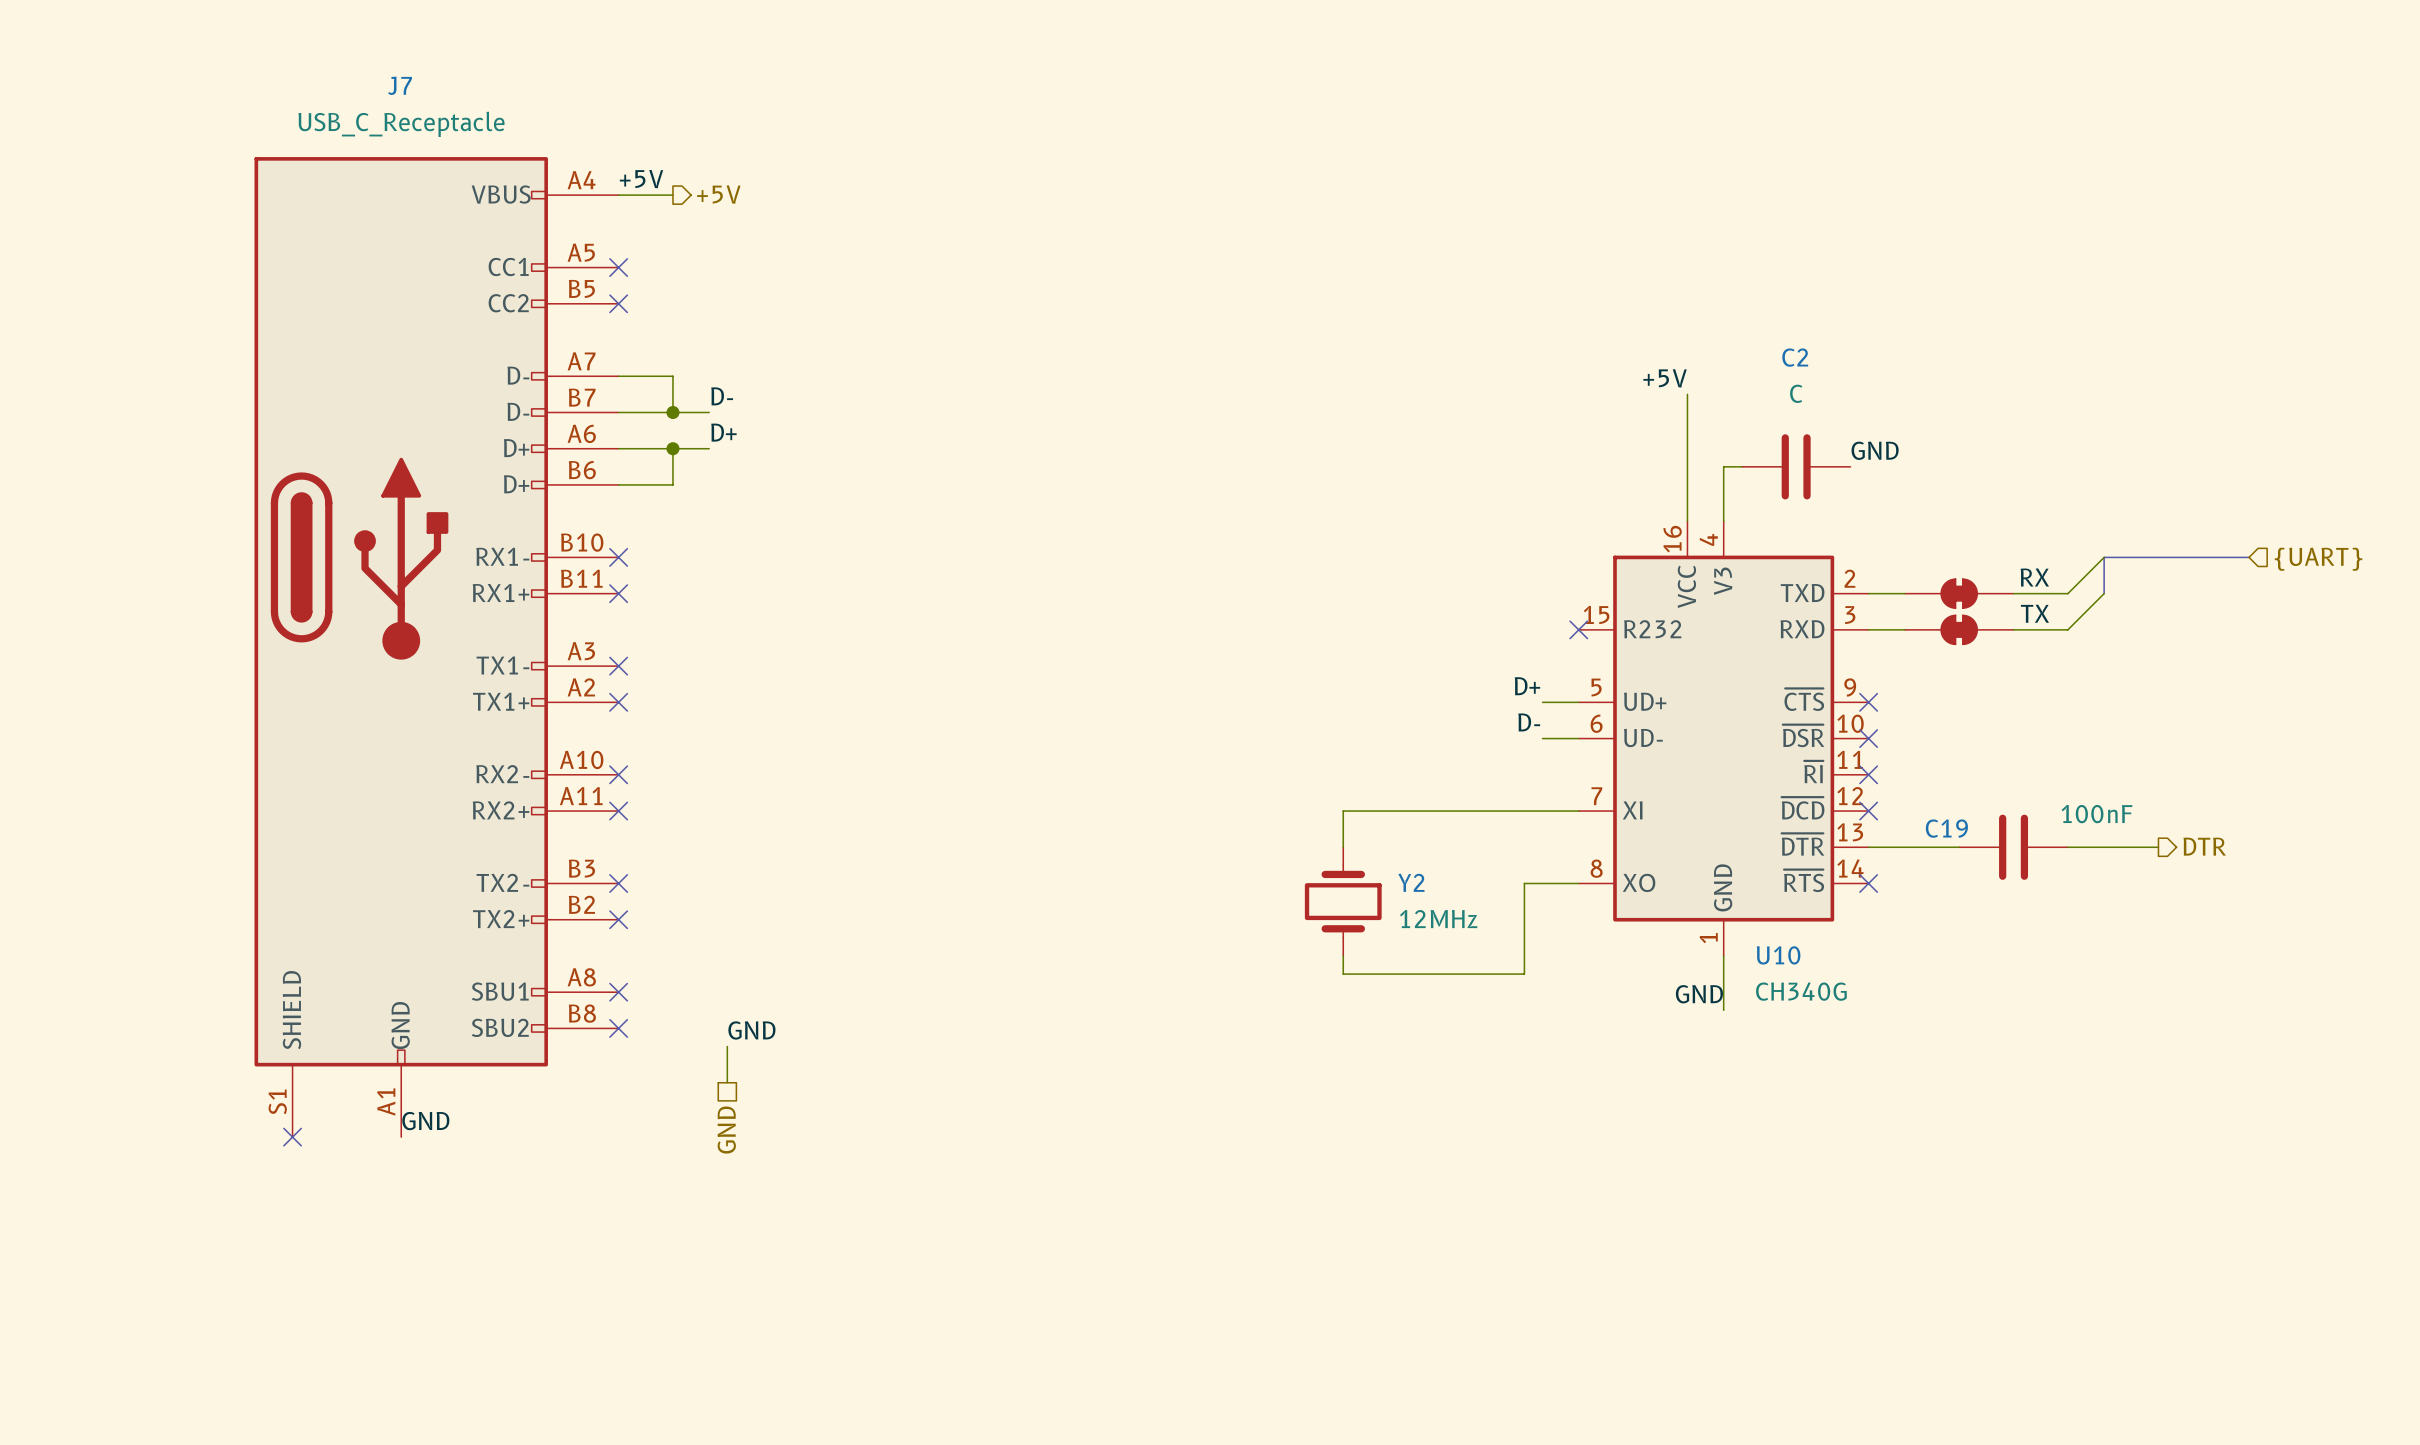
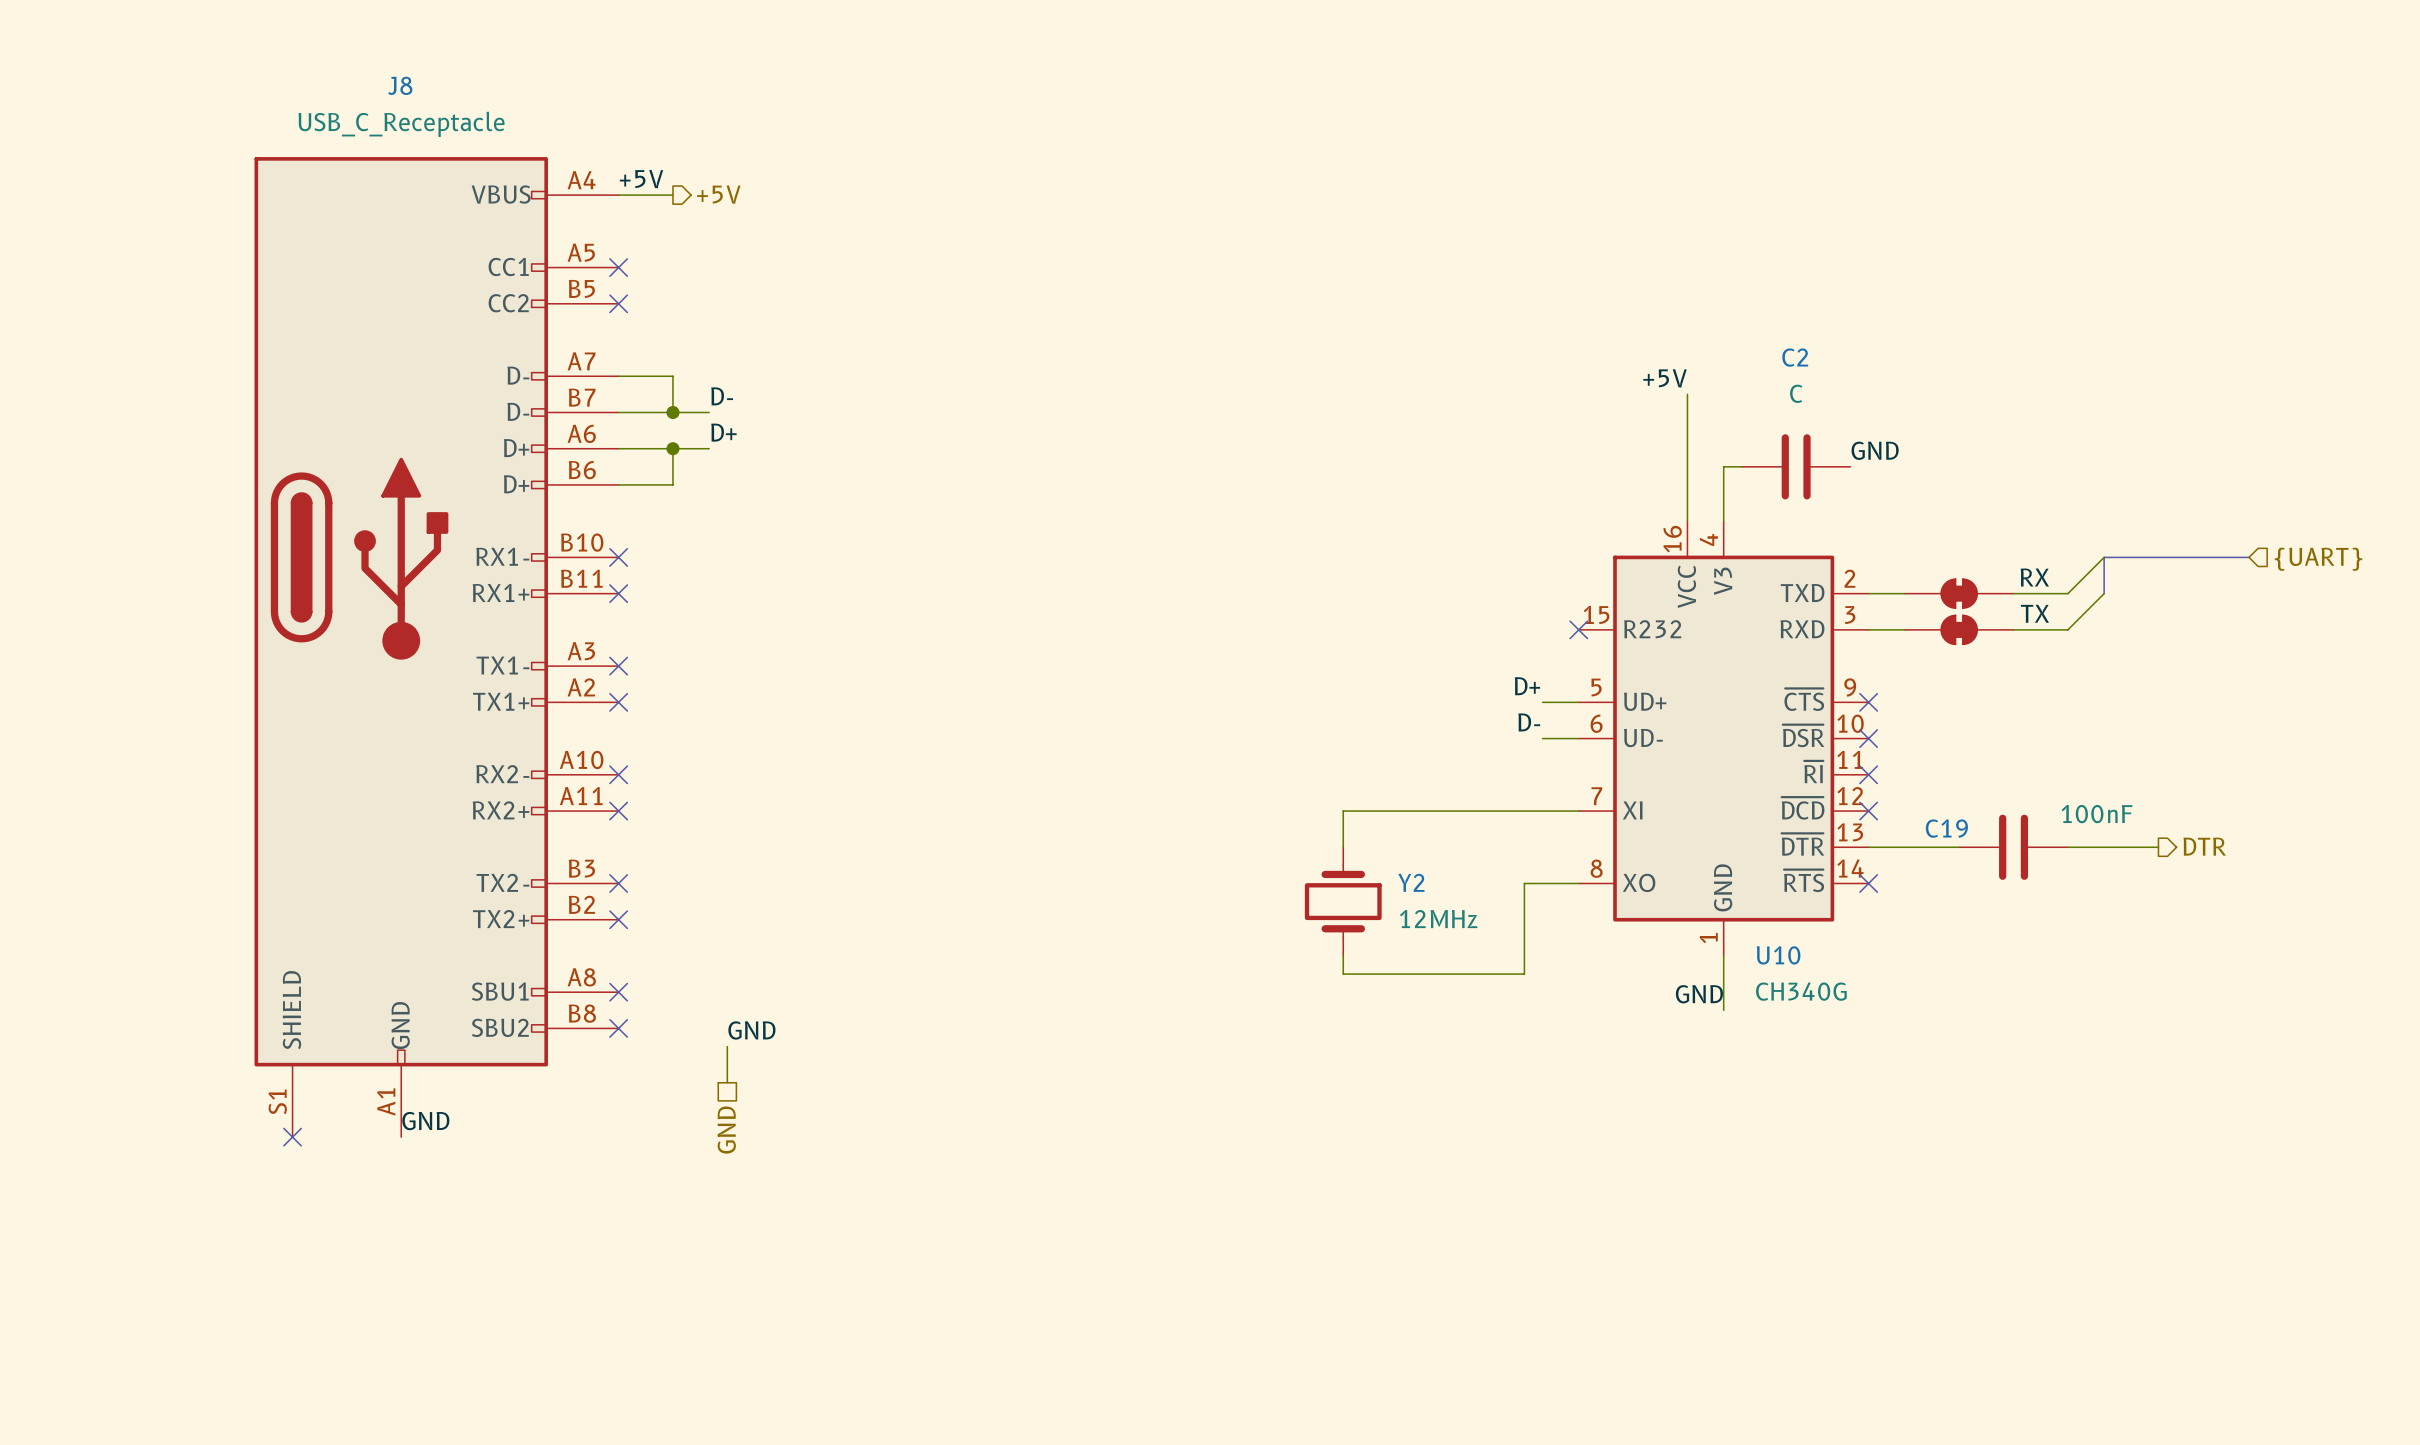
J7 name: J7 (400, 85) -> J8 (400, 85)

